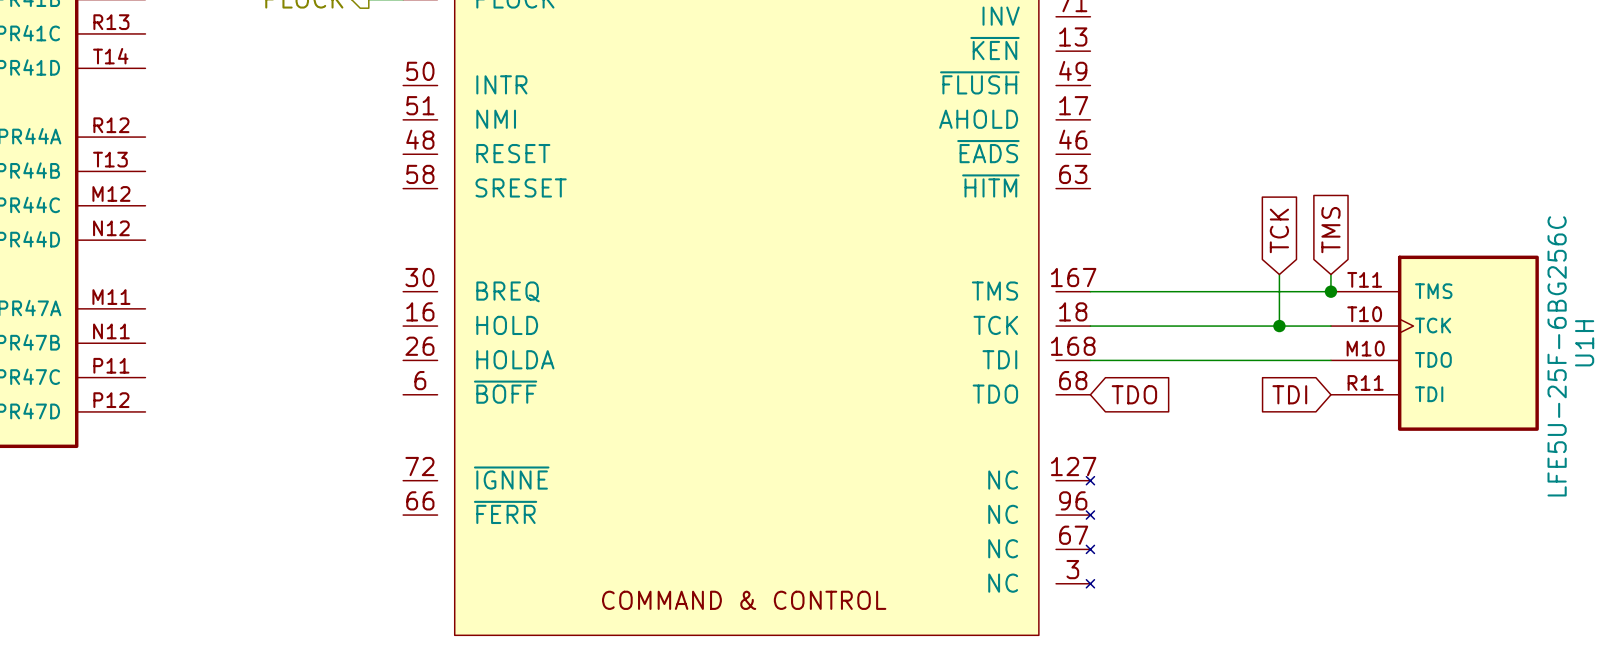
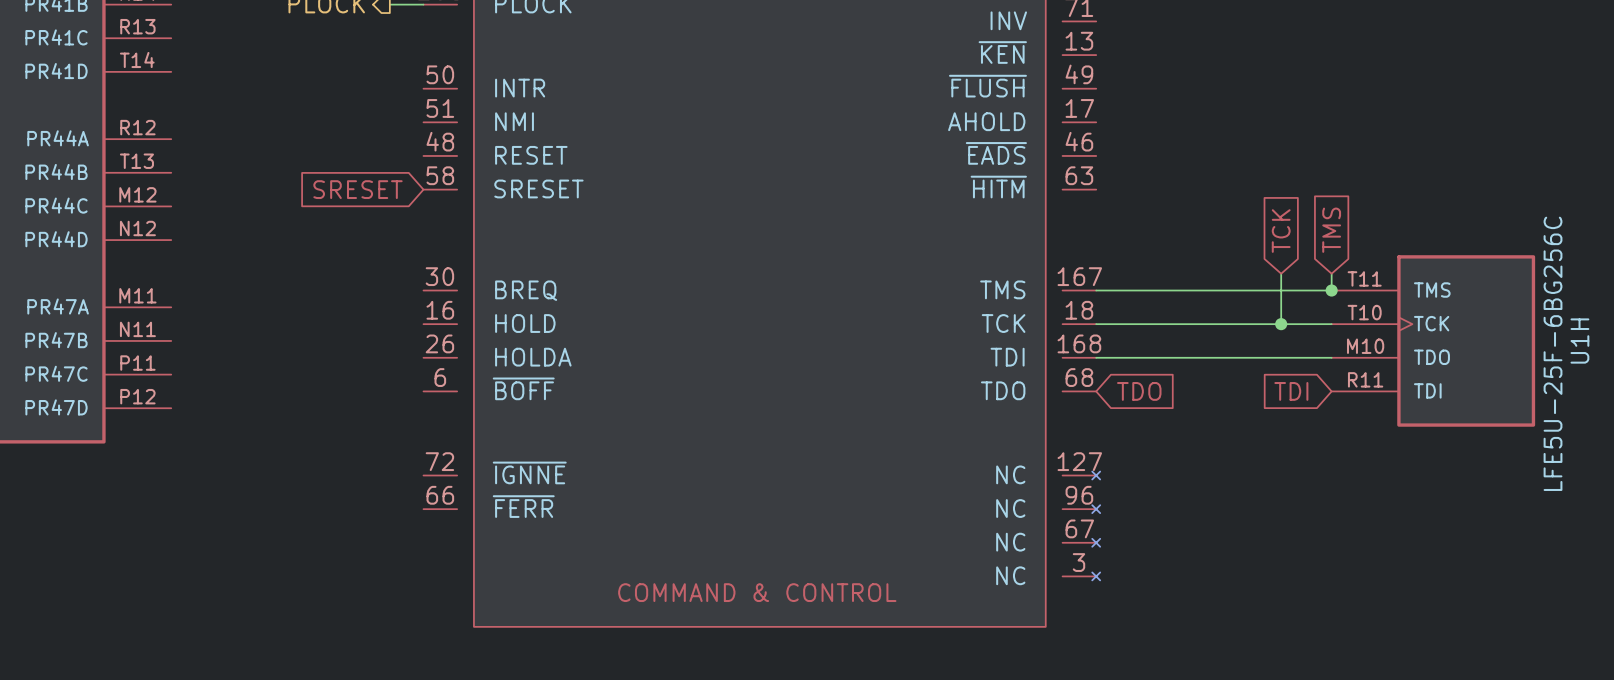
global label: none -> SRESET (358, 189)

